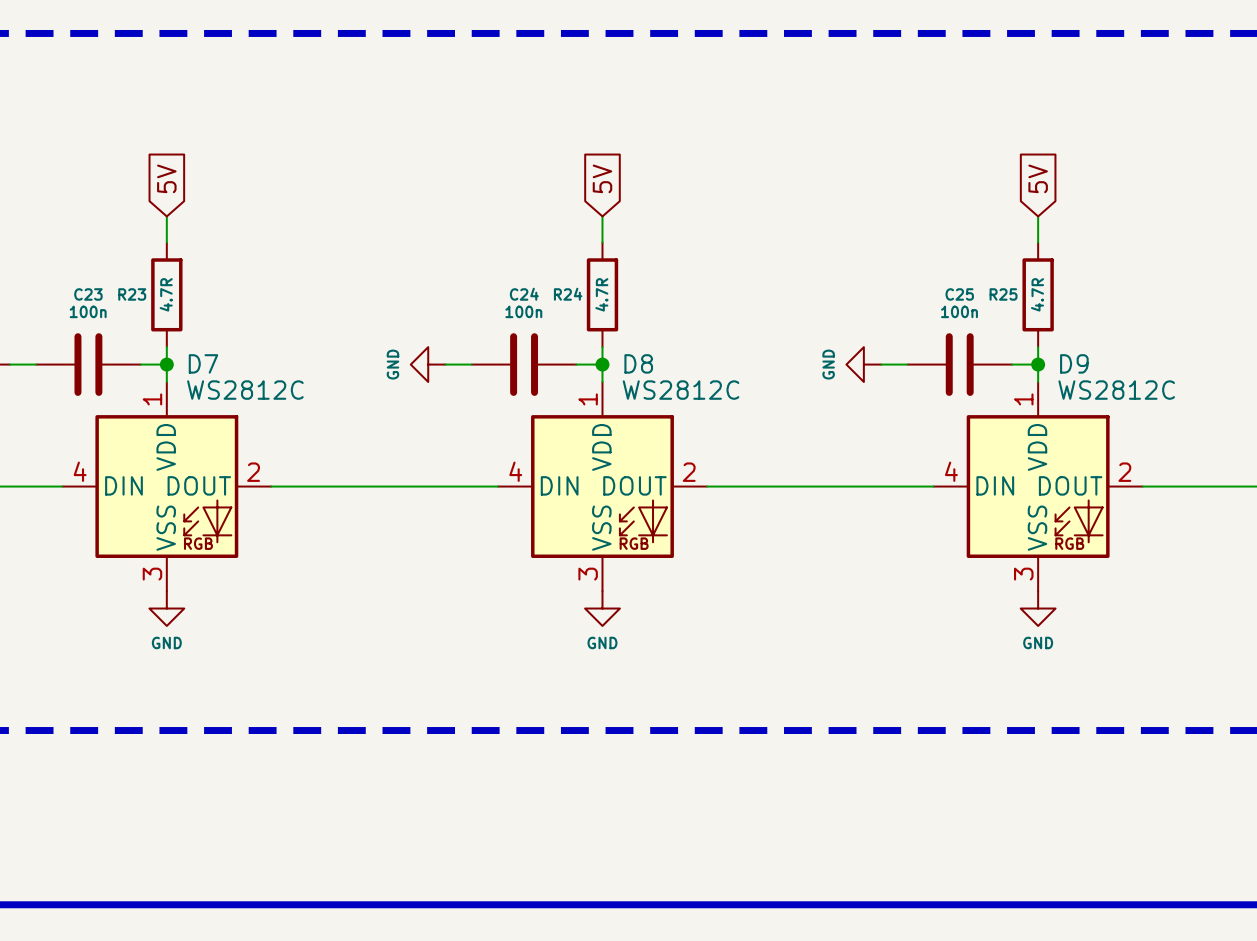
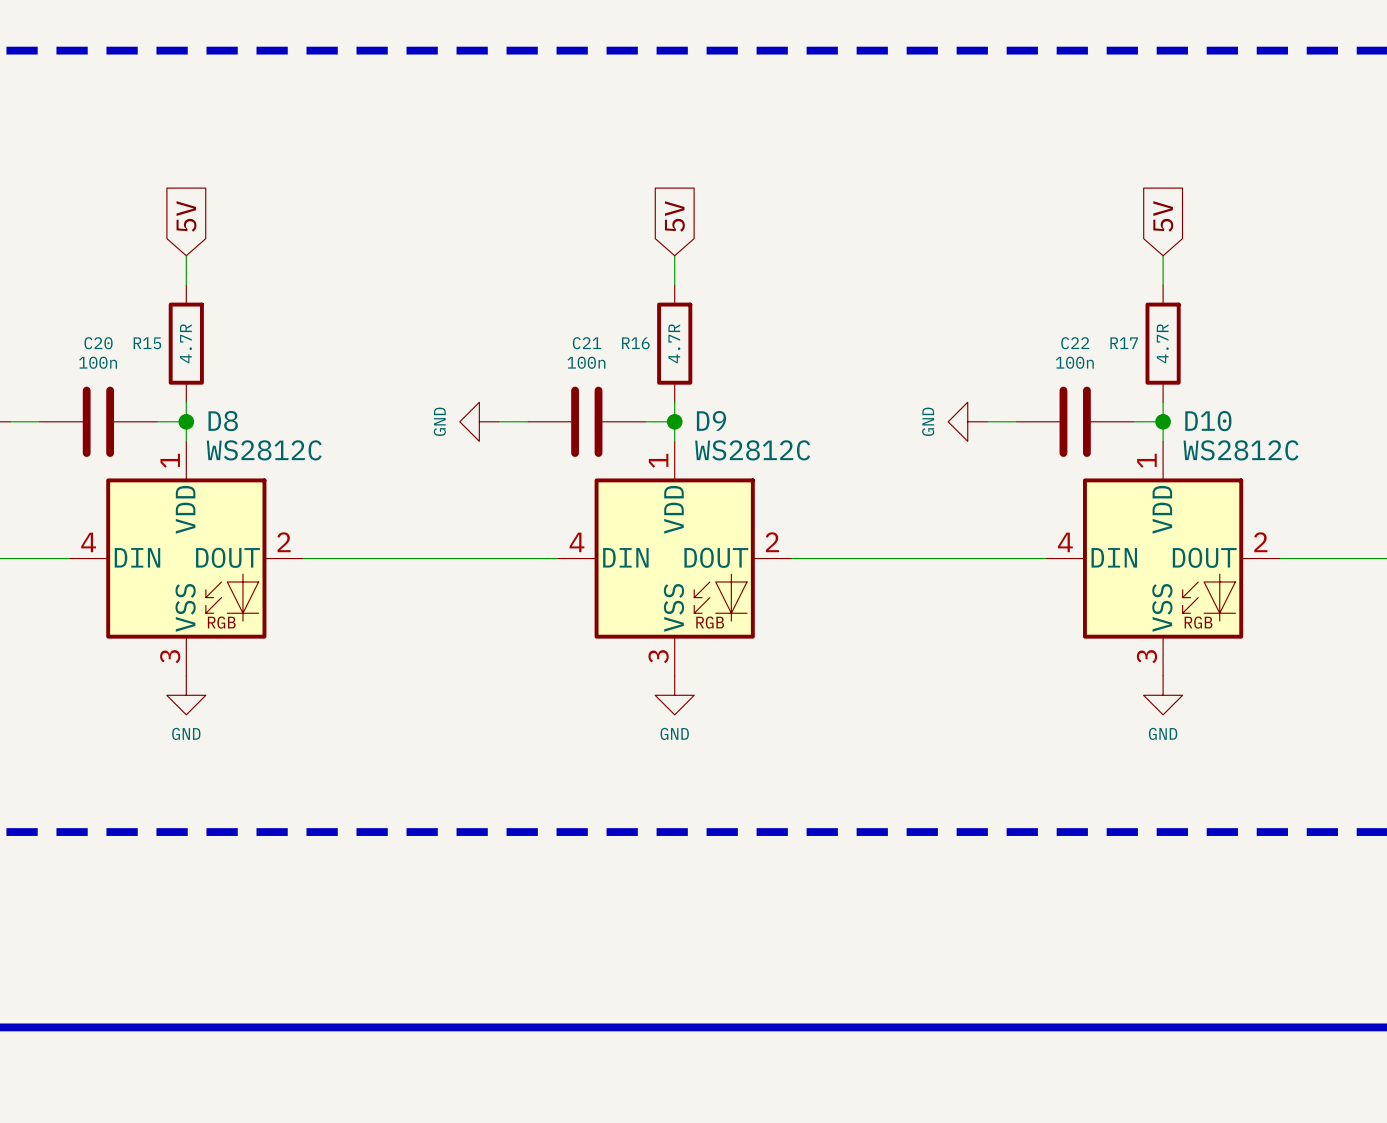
C23 name: C23 (88, 294) -> C20 (98, 343)
R23 name: R23 (132, 294) -> R15 (147, 343)
C24 name: C24 (524, 294) -> C21 (586, 343)
R24 name: R24 (568, 294) -> R16 (635, 343)
C25 name: C25 (959, 294) -> C22 (1075, 343)
R25 name: R25 (1003, 294) -> R17 (1124, 343)
D7 name: D7 (203, 363) -> D8 (223, 421)
D8 name: D8 (638, 363) -> D9 (711, 420)
D9 name: D9 (1074, 363) -> D10 (1208, 421)

